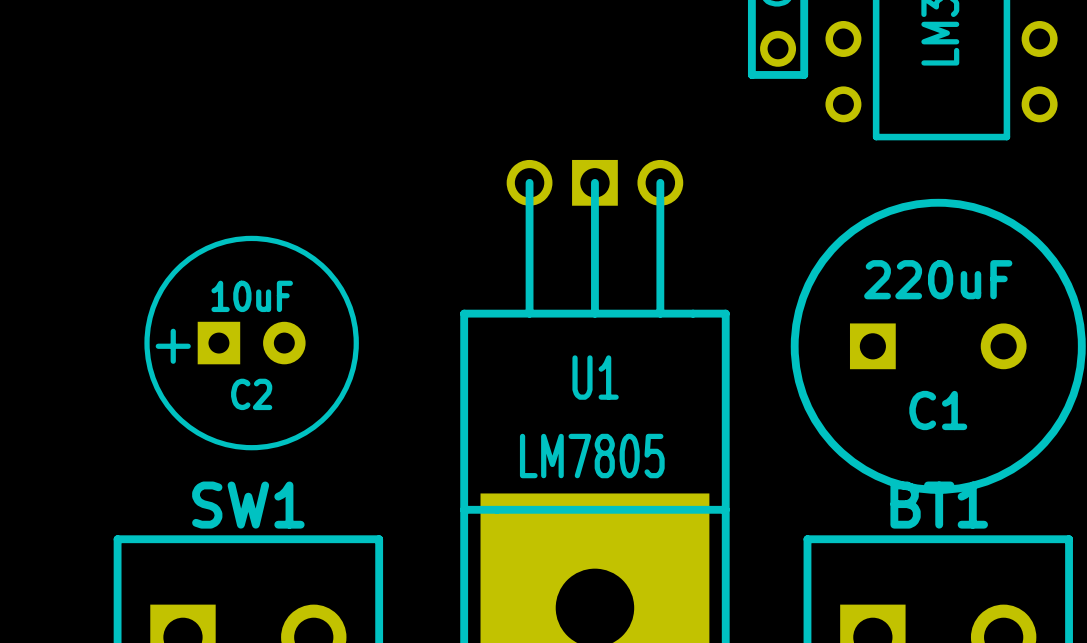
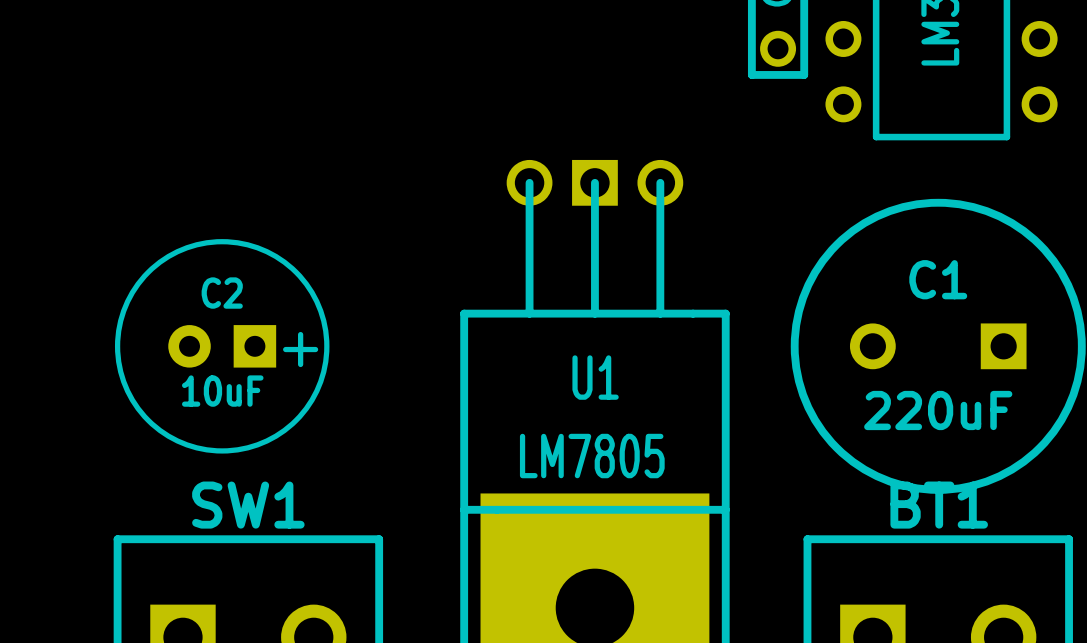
C2 rotation: 0° (251, 343) -> 180° (222, 346)
C1 rotation: 0° (938, 346) -> 180° (938, 346)

